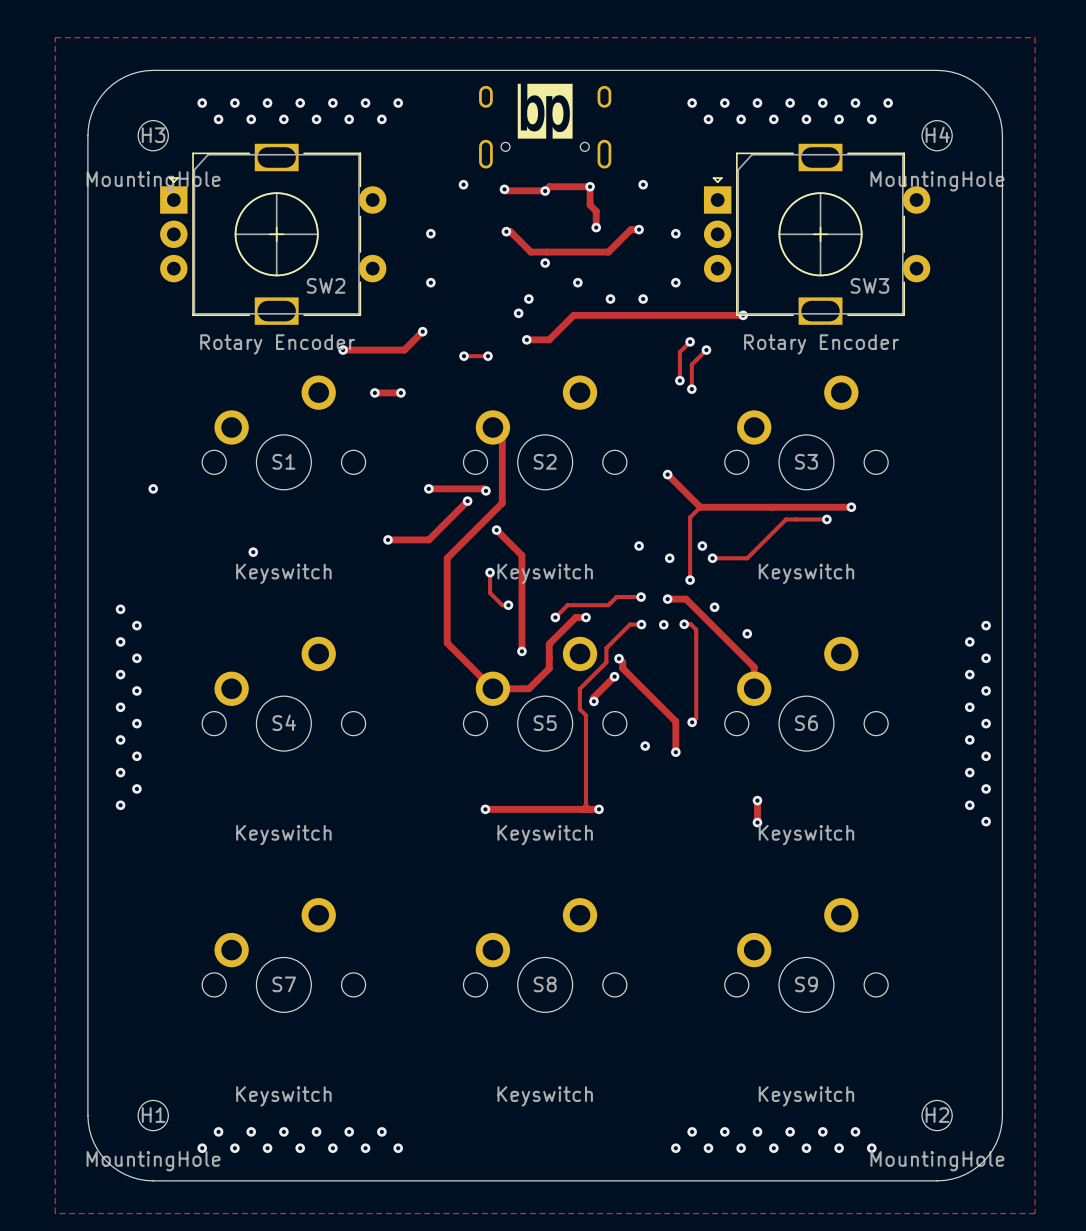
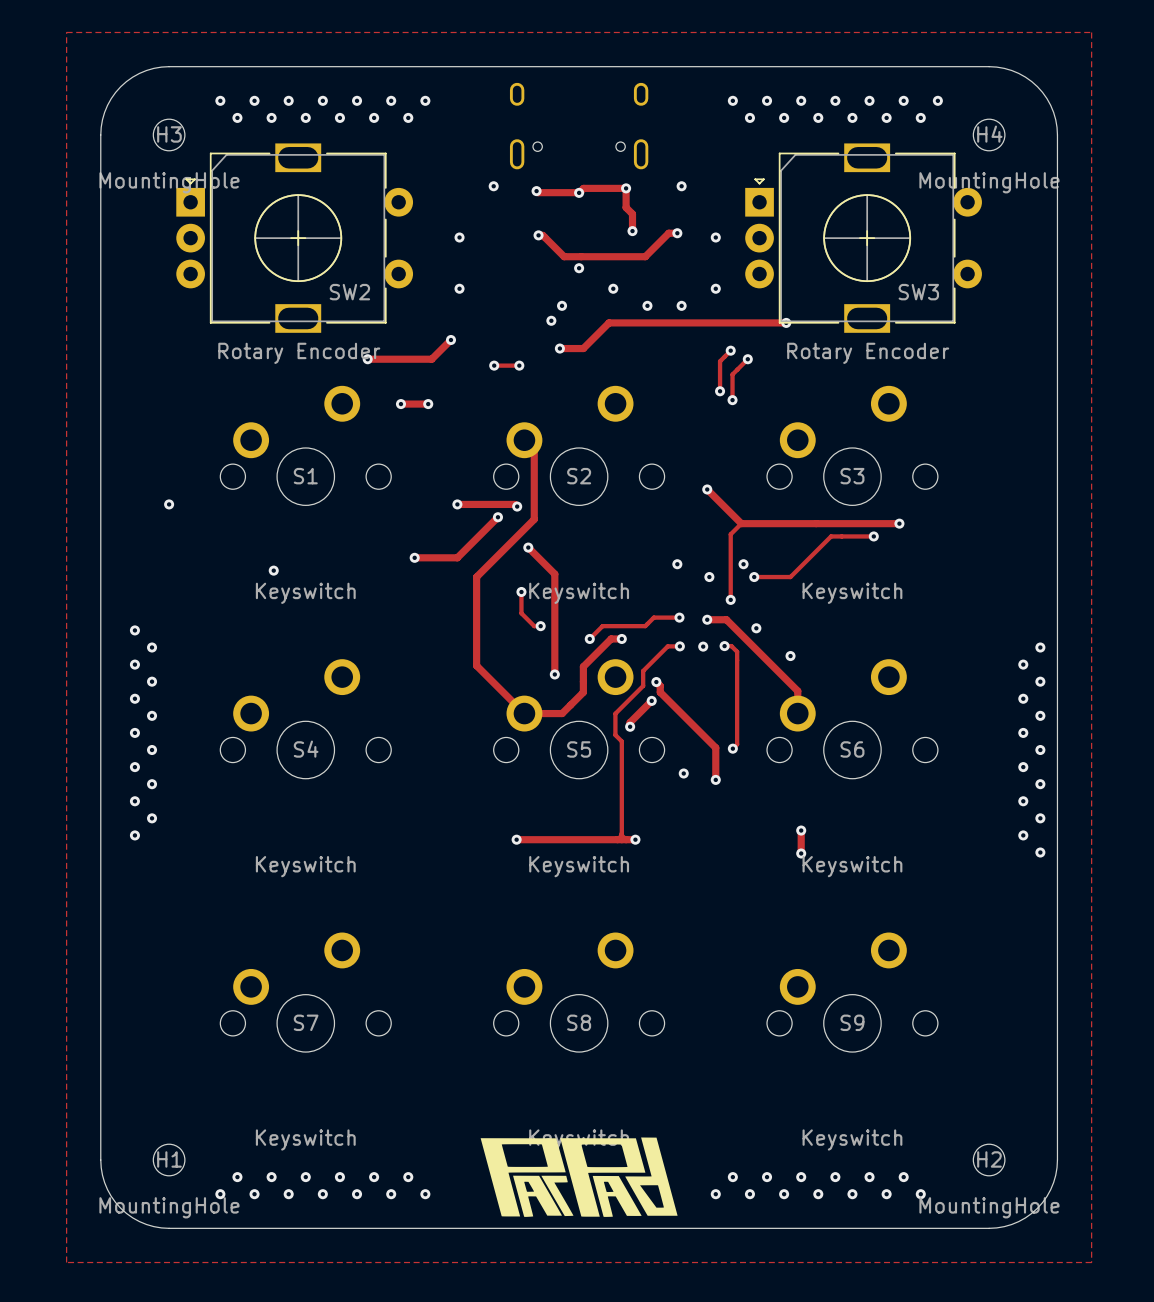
drawing: [517, 83, 573, 139] -> none
drawing: none -> [480, 1137, 678, 1217]

